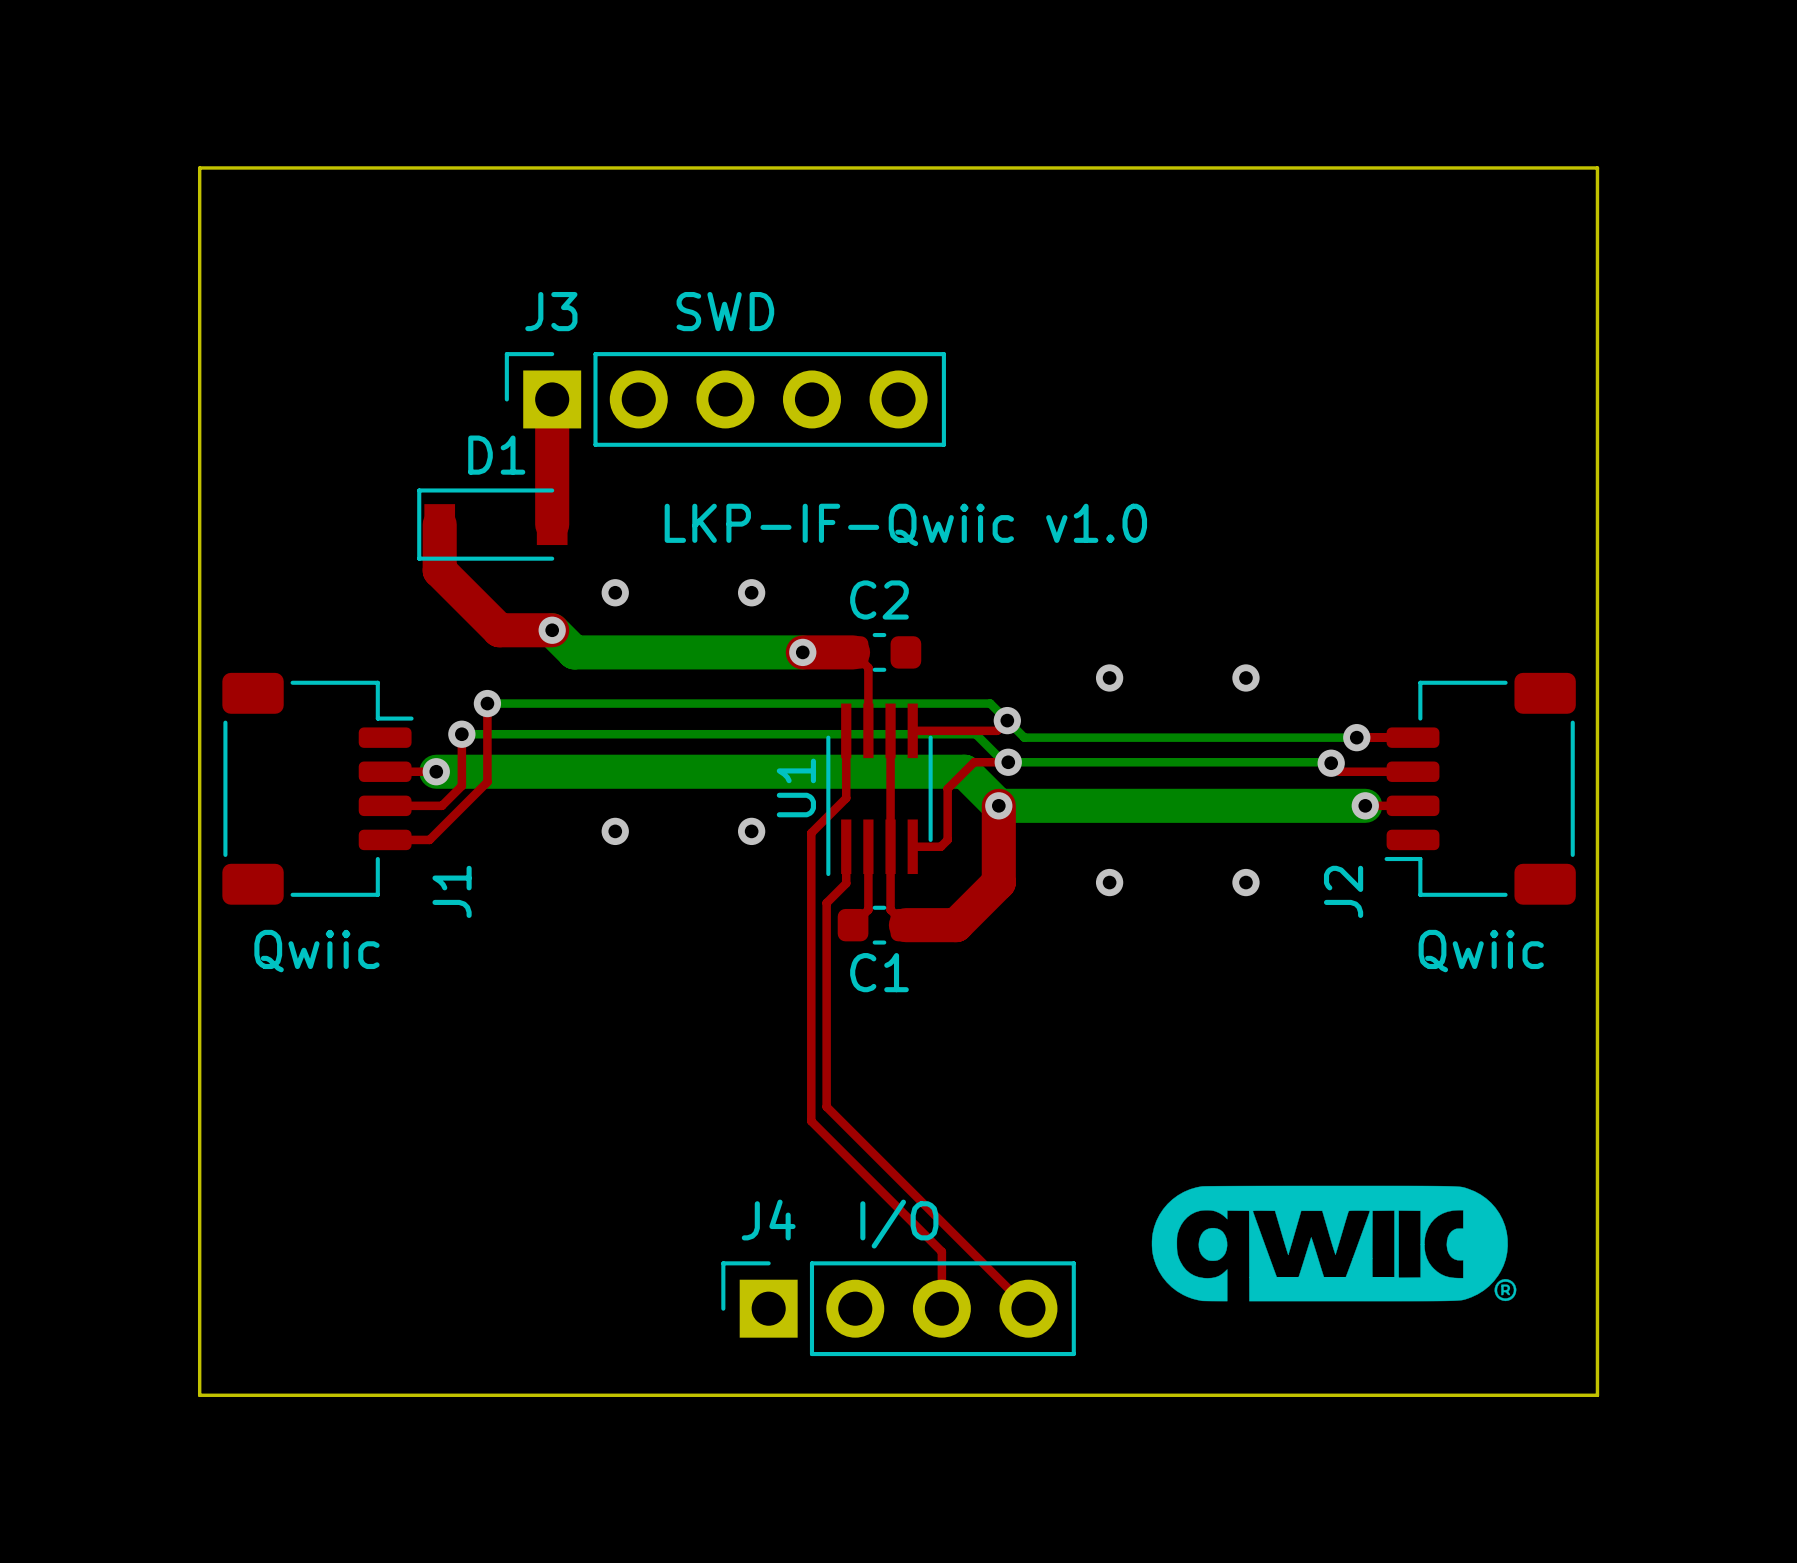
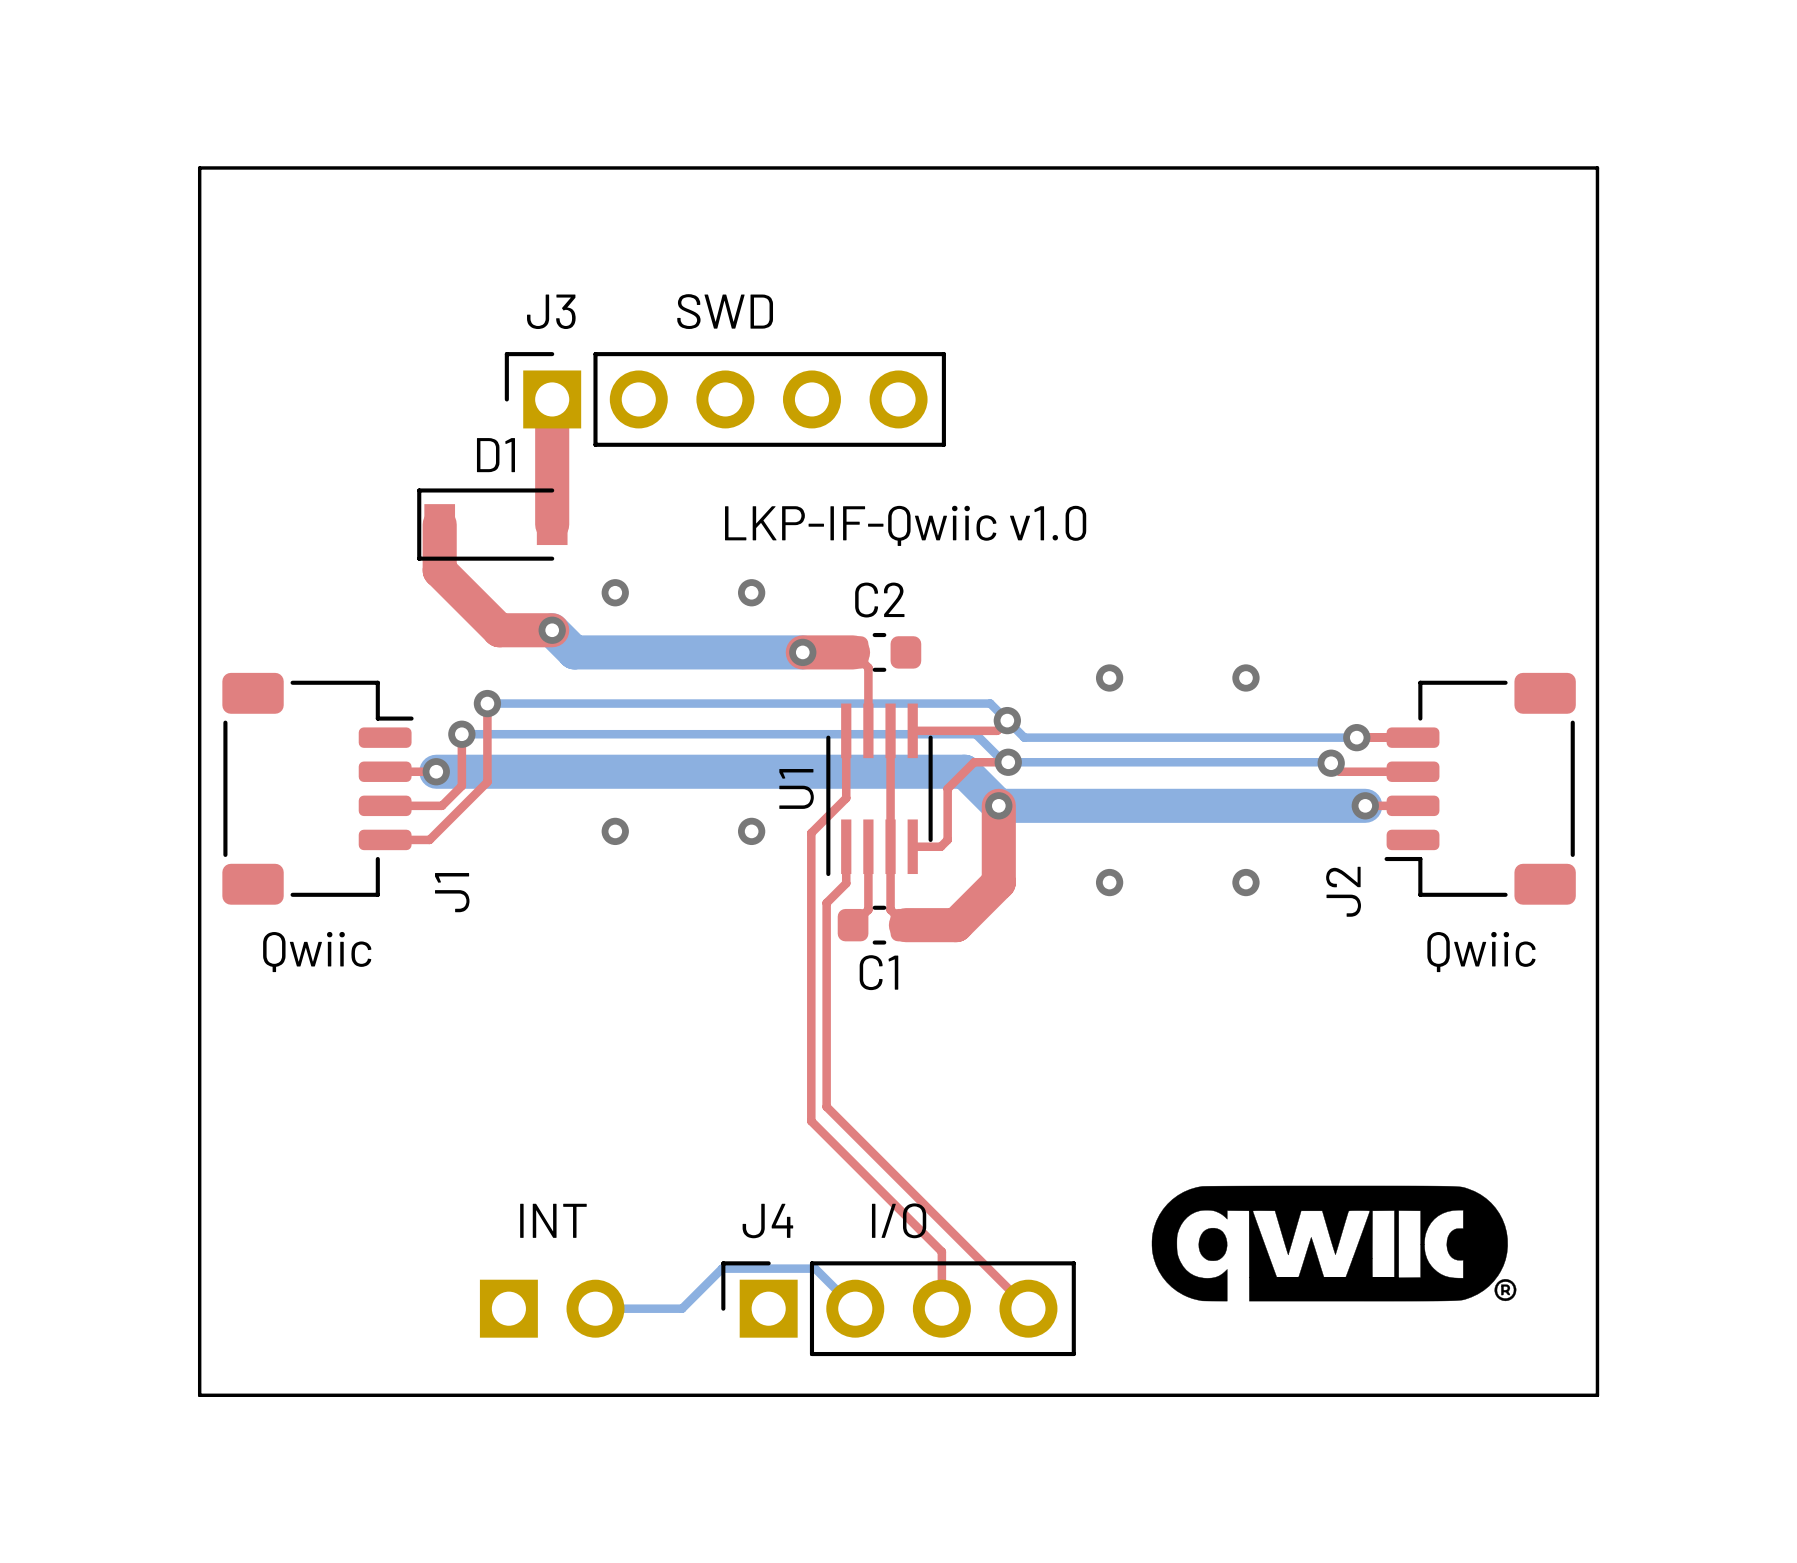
text: none -> INT (553, 1220)
part: none -> (552, 1308)
bottom track: none -> (595, 1308) (682, 1308) (722, 1268) (815, 1268) (855, 1308)

